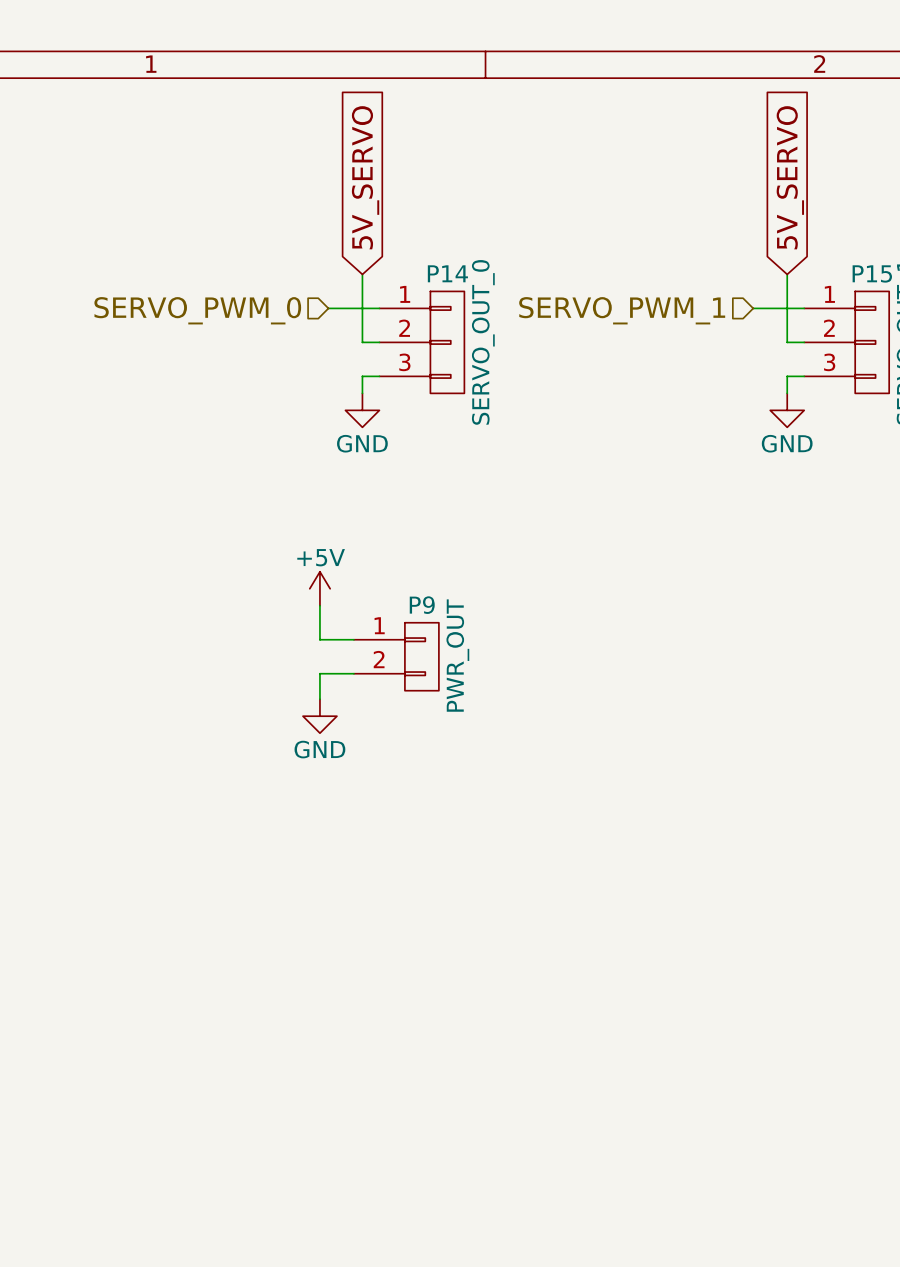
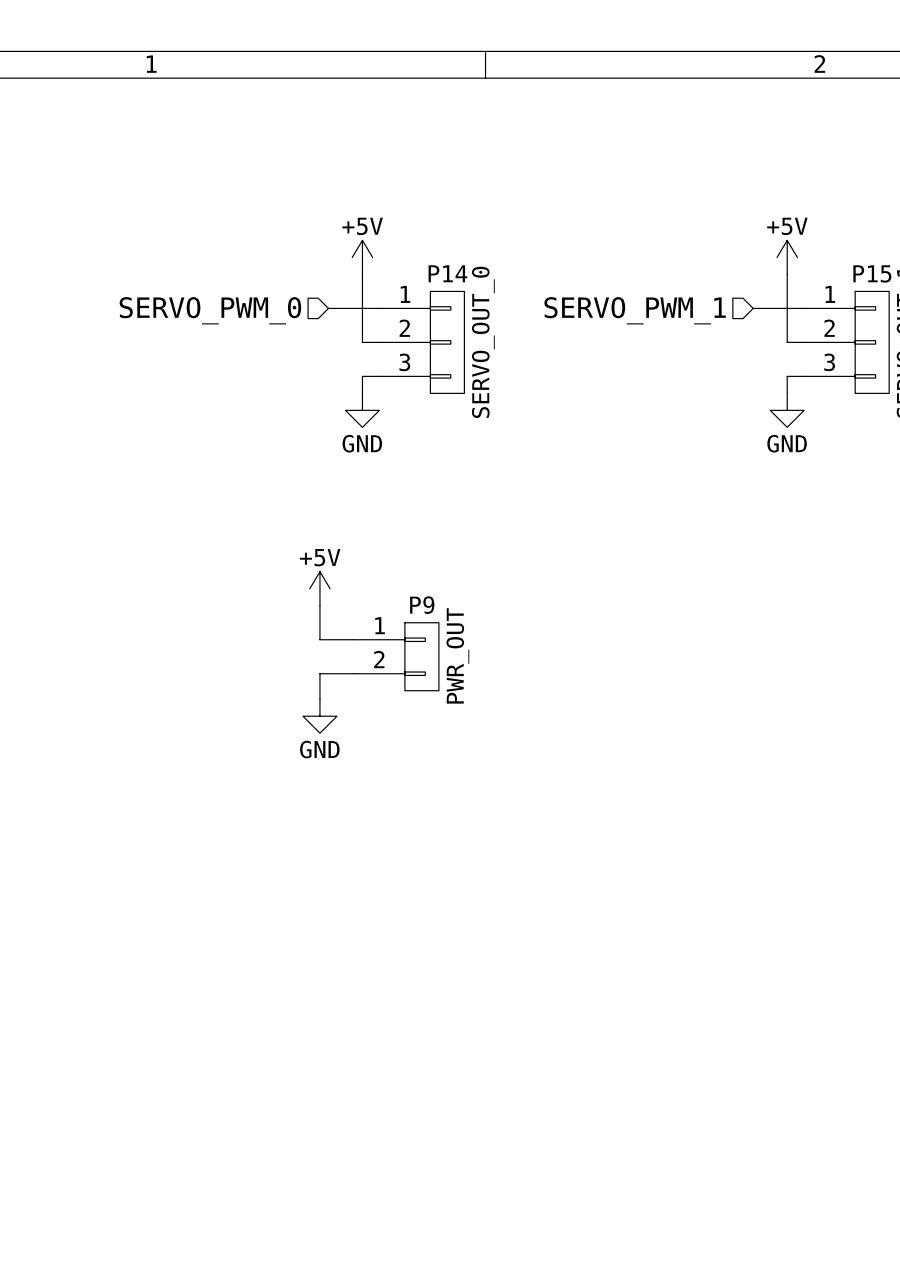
global label: 5V_SERVO (365, 177) -> none
global label: 5V_SERVO (790, 177) -> none
power symbol: none -> +5V (362, 257)
power symbol: none -> +5V (787, 257)

